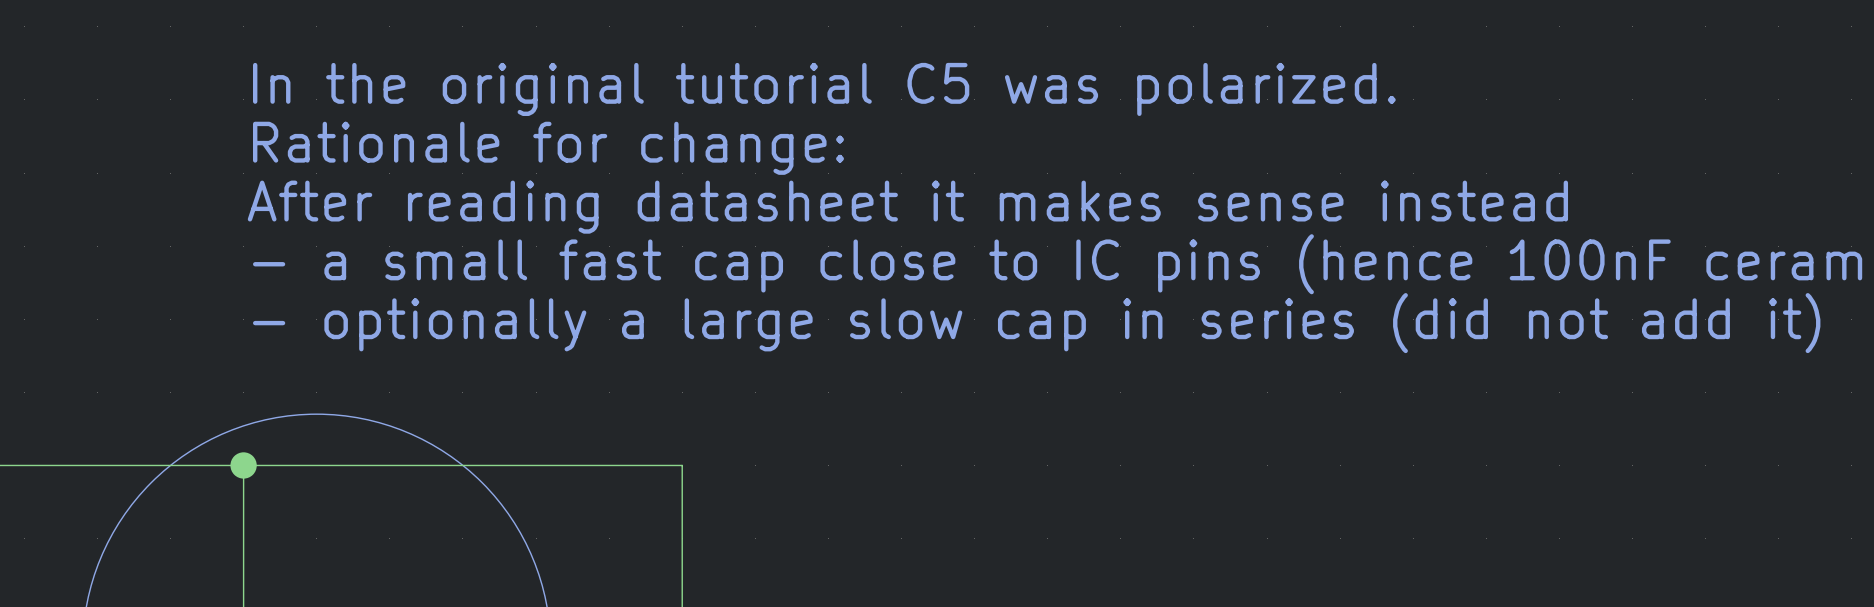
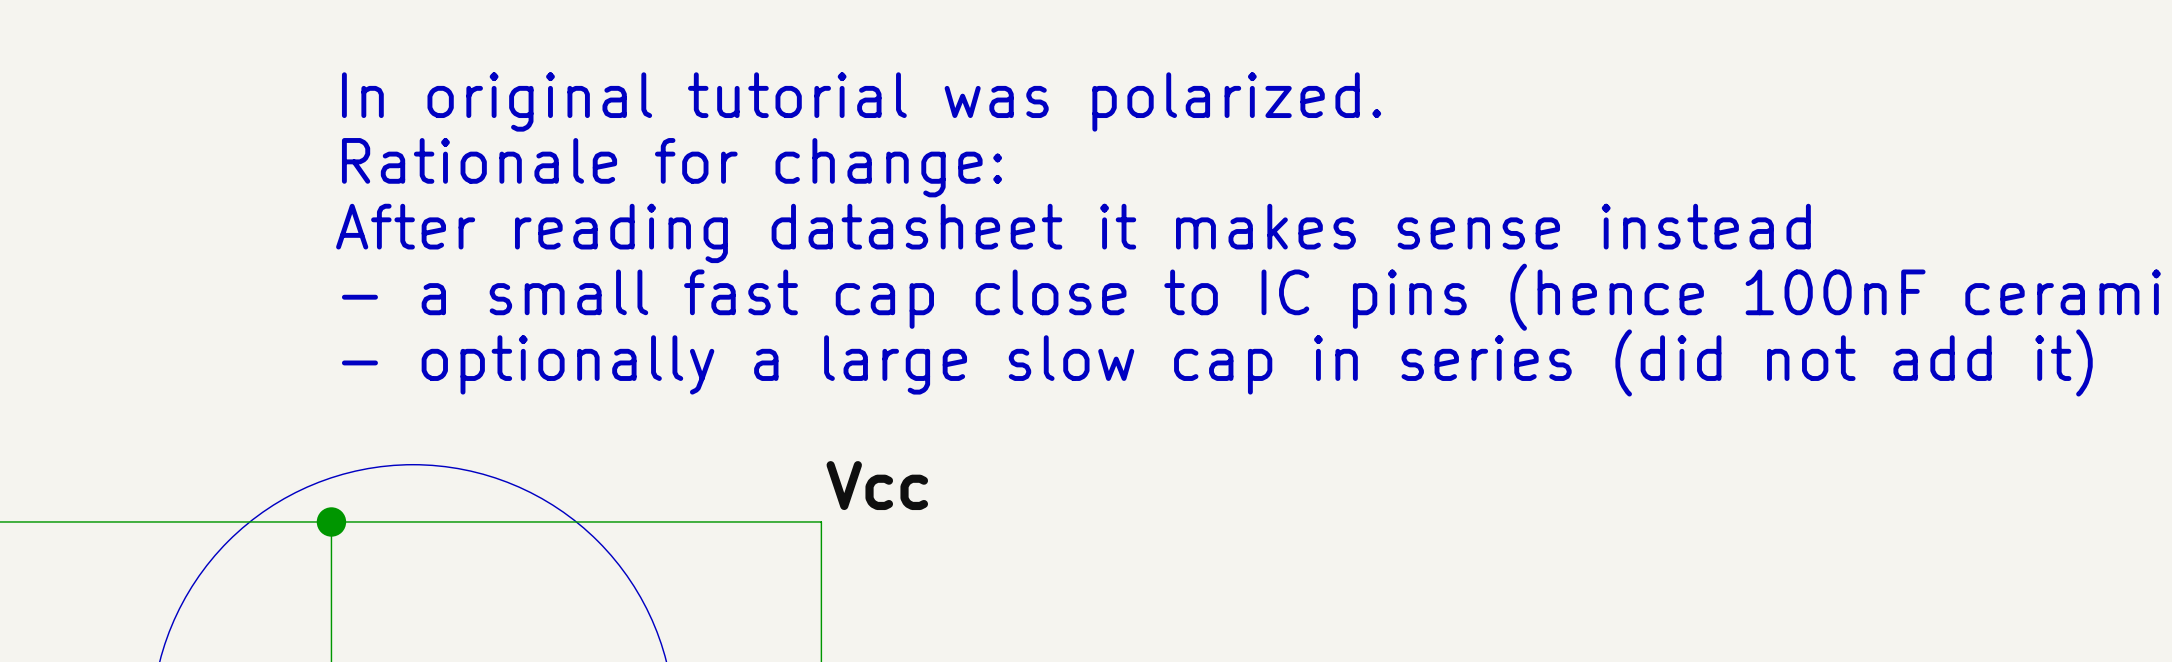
text: In the original tutorial C5 was polarized. (824, 89) -> In original tutorial was polarized. (861, 101)
label: none -> Vcc (877, 485)

